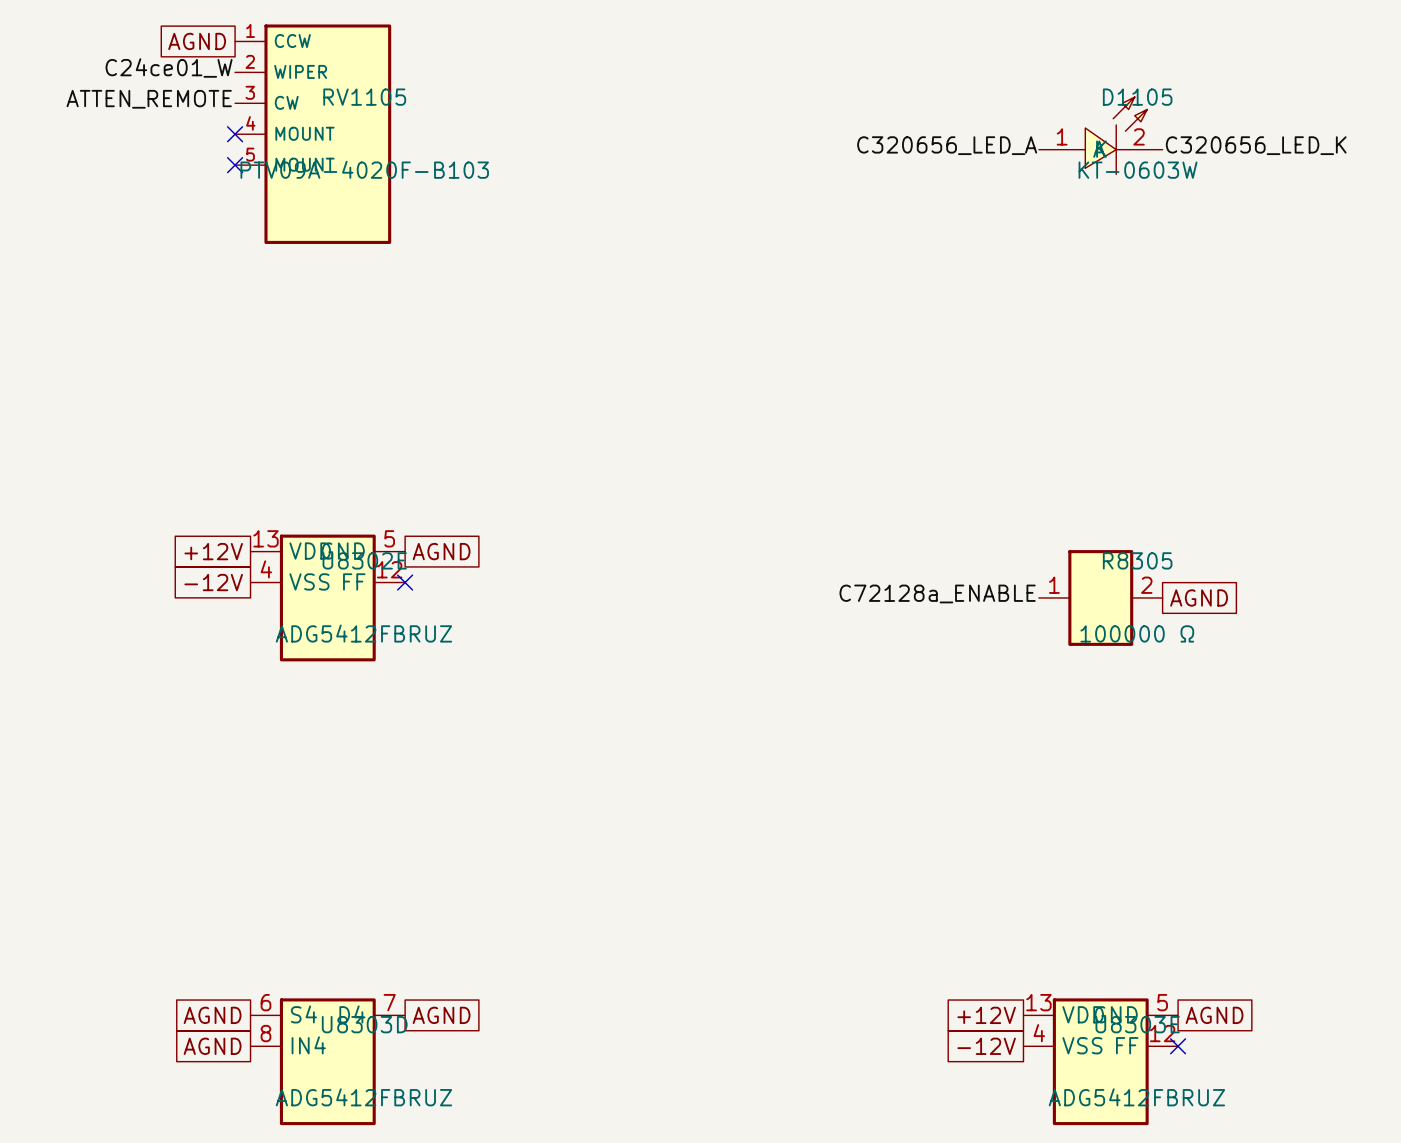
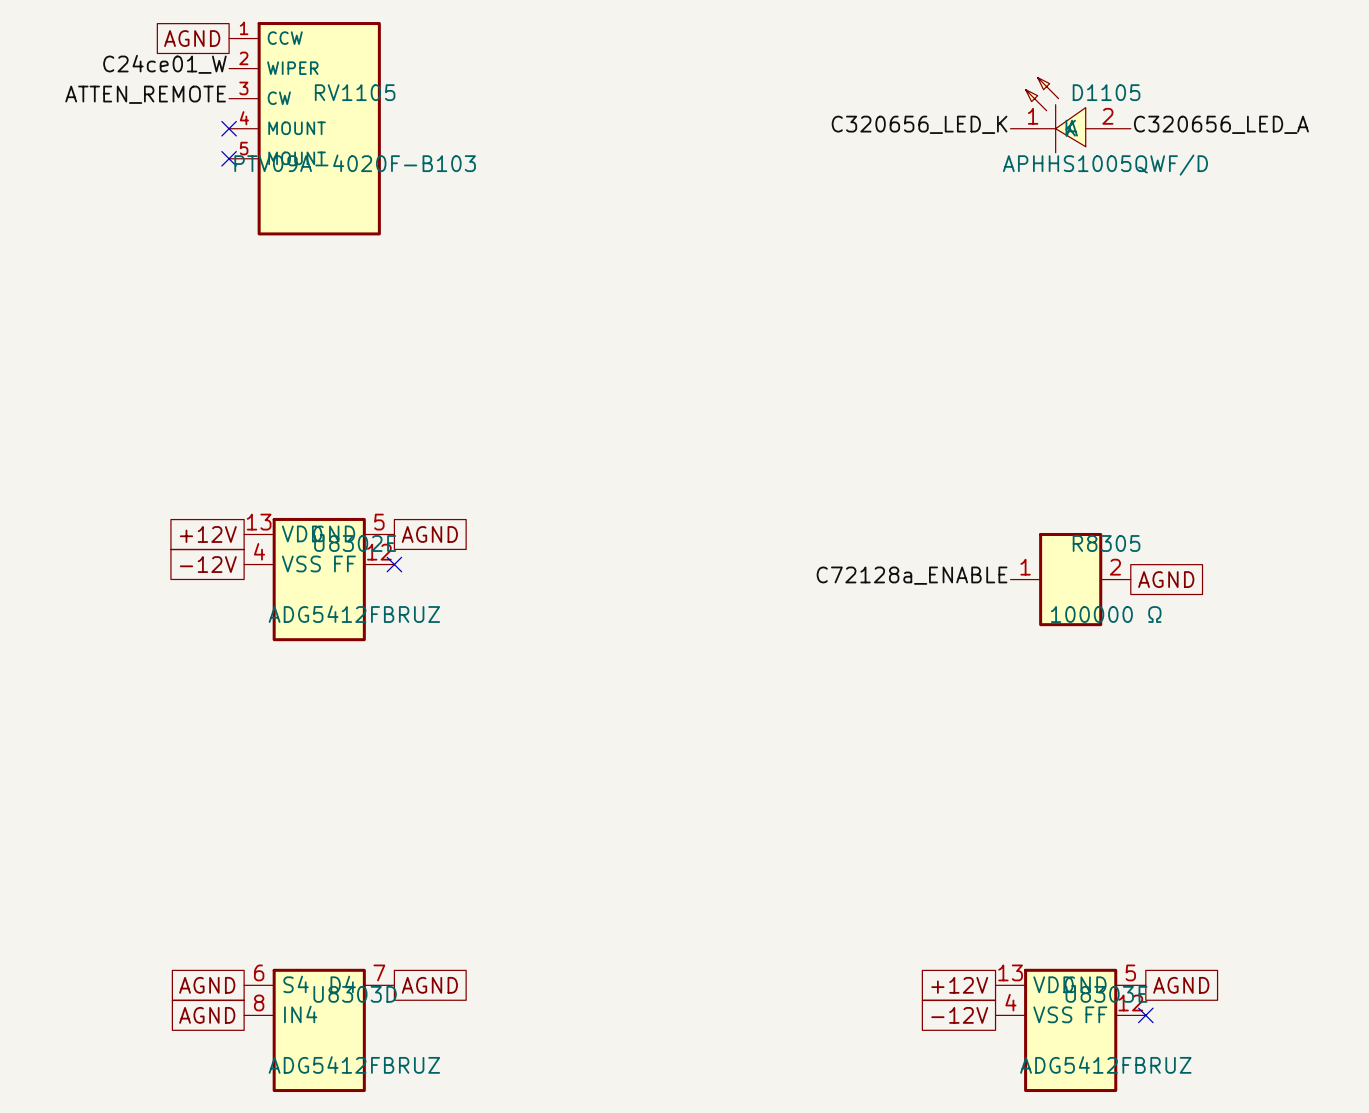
D1105 symbol: [1038, 97, 1163, 175] -> [1010, 77, 1131, 153]
label position: C320656_LED_A (947, 145) -> C320656_LED_A (1221, 124)
label position: C320656_LED_K (1256, 145) -> C320656_LED_K (919, 124)
D1105 value: KT-0603W (1138, 170) -> APHHS1005QWF/D (1105, 165)

